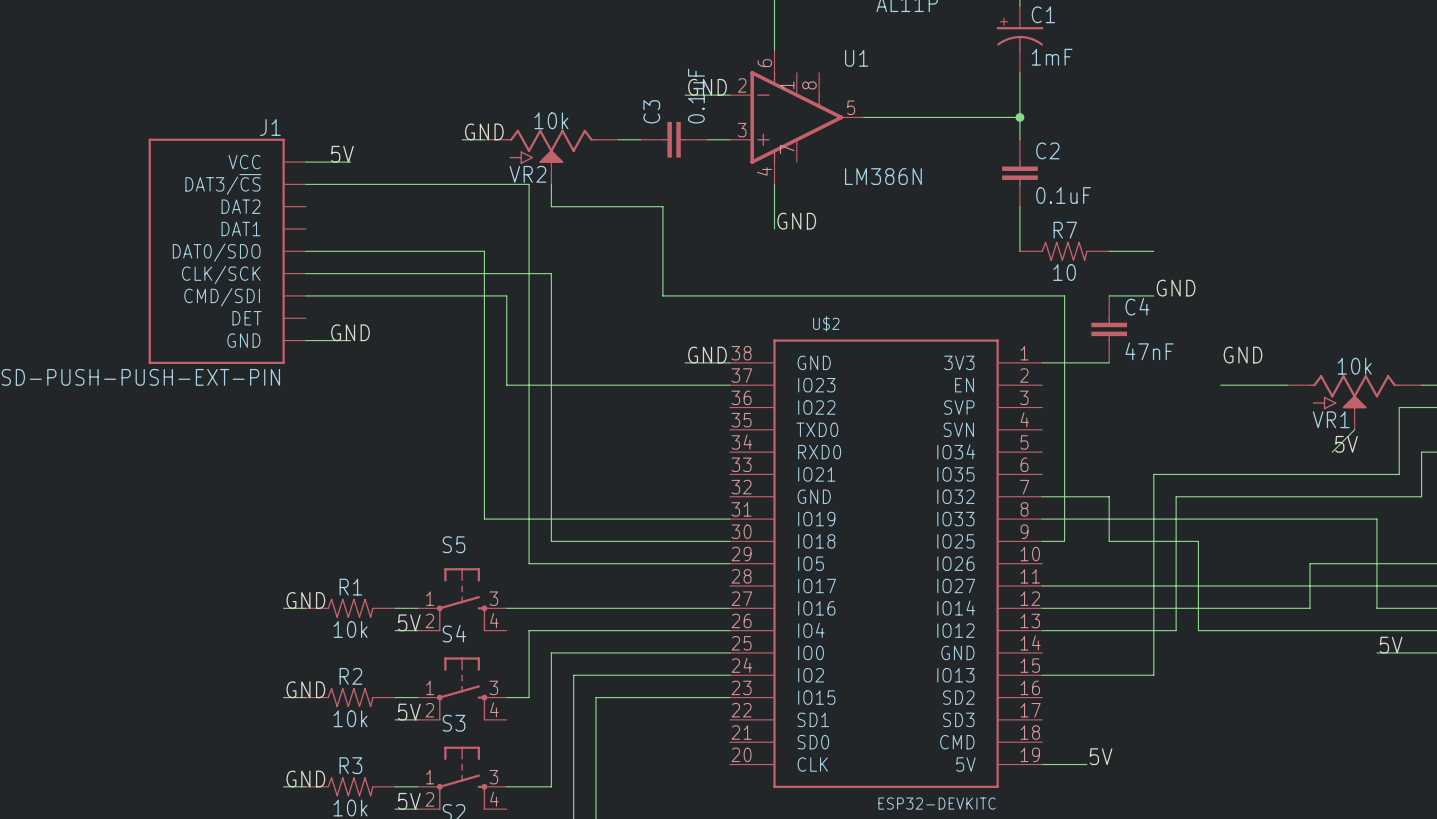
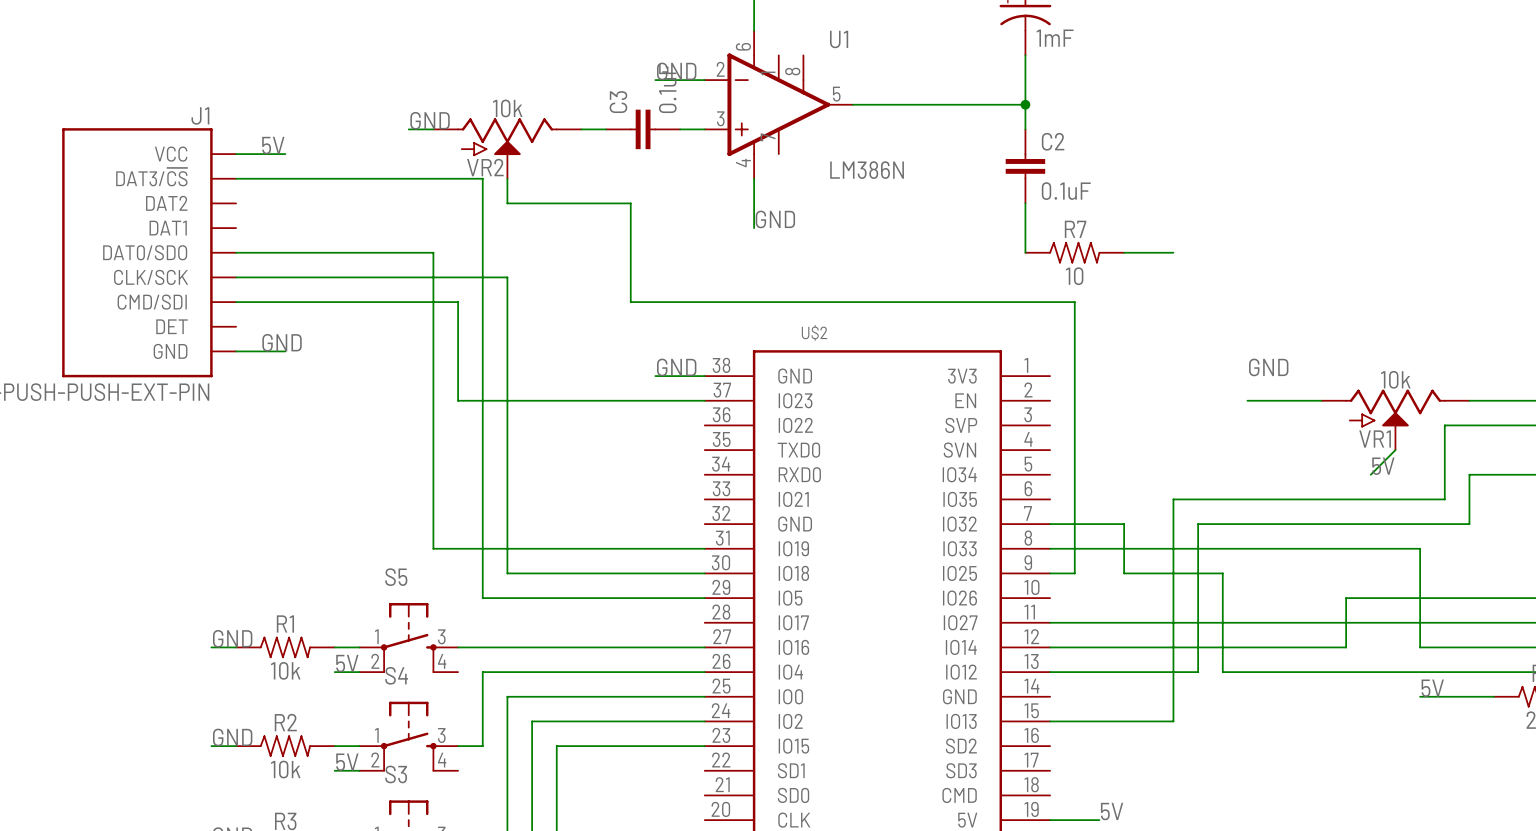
label: GND (1176, 288) -> none
wire: (1109, 295) (1153, 295) -> none
C4: 47nF (1109, 329) -> none
wire: (1042, 362) (1109, 362) -> none

